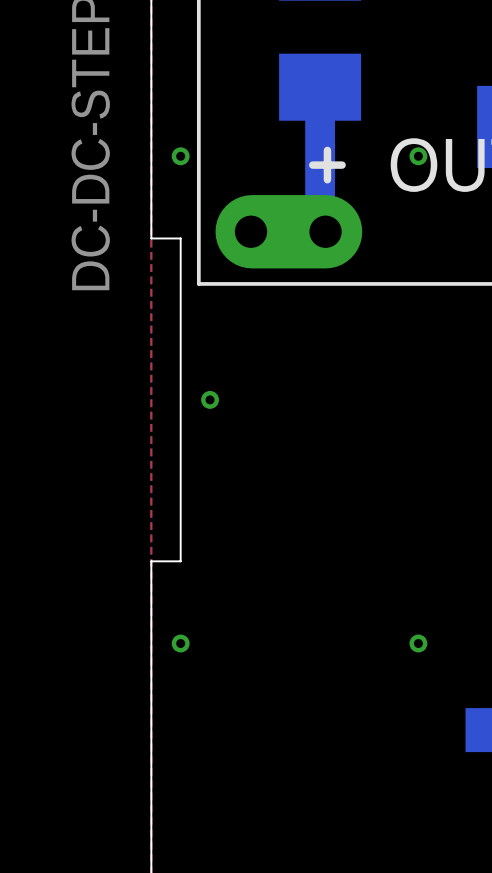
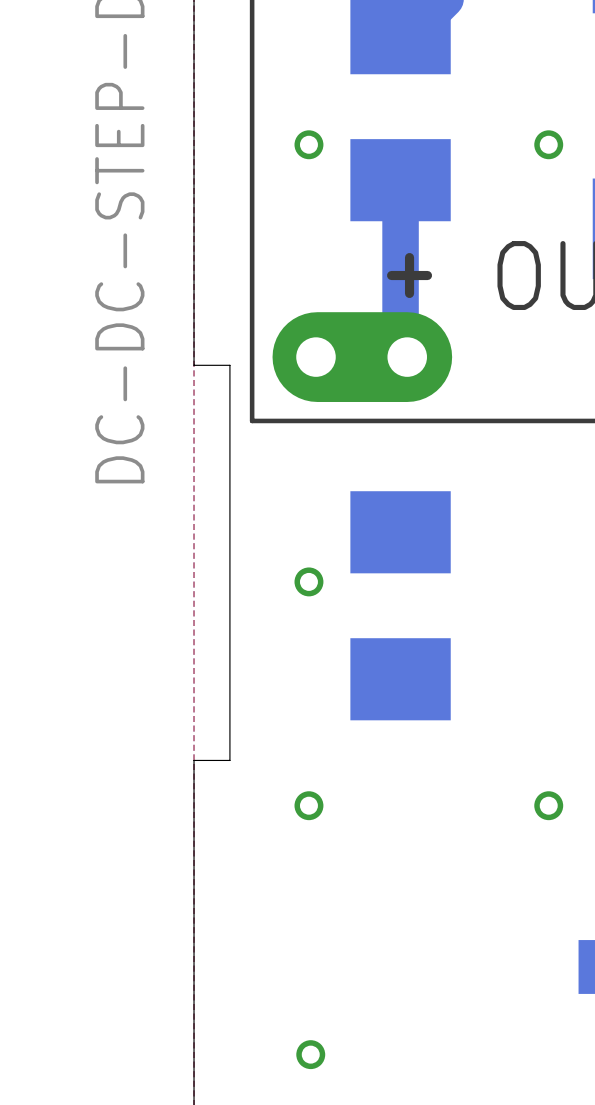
via: none -> (308, 144)
via: none -> (548, 144)
via: (180, 156) -> none
via: (418, 156) -> none
via: (210, 399) -> none
via: none -> (308, 581)
part: none -> (400, 605)
via: none -> (308, 805)
via: none -> (548, 805)
via: (180, 643) -> none
via: (418, 643) -> none
via: none -> (310, 1054)

